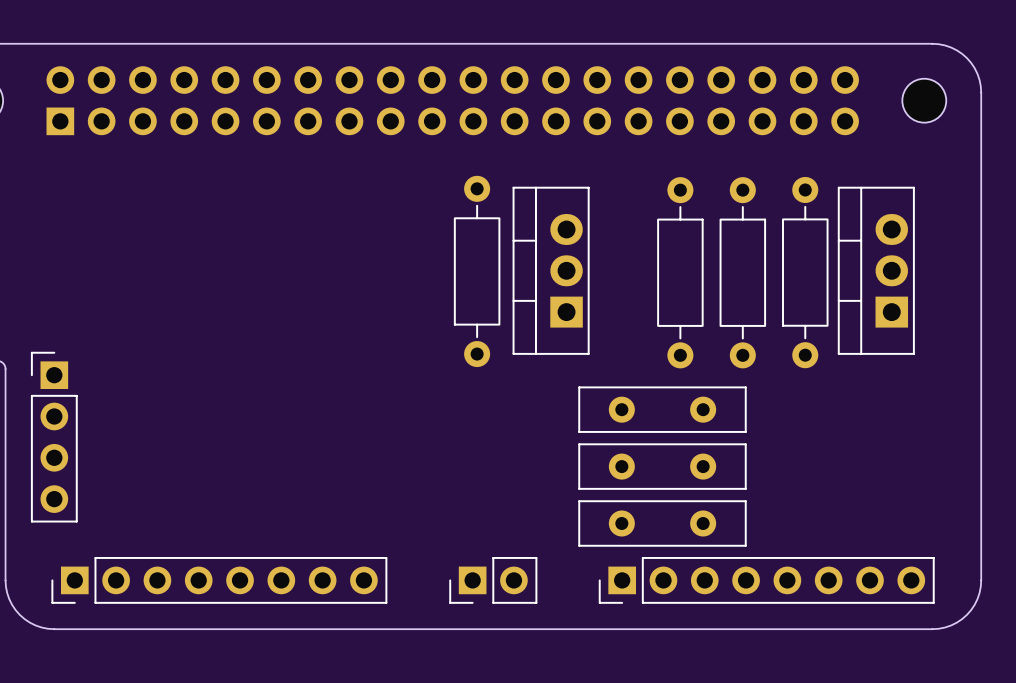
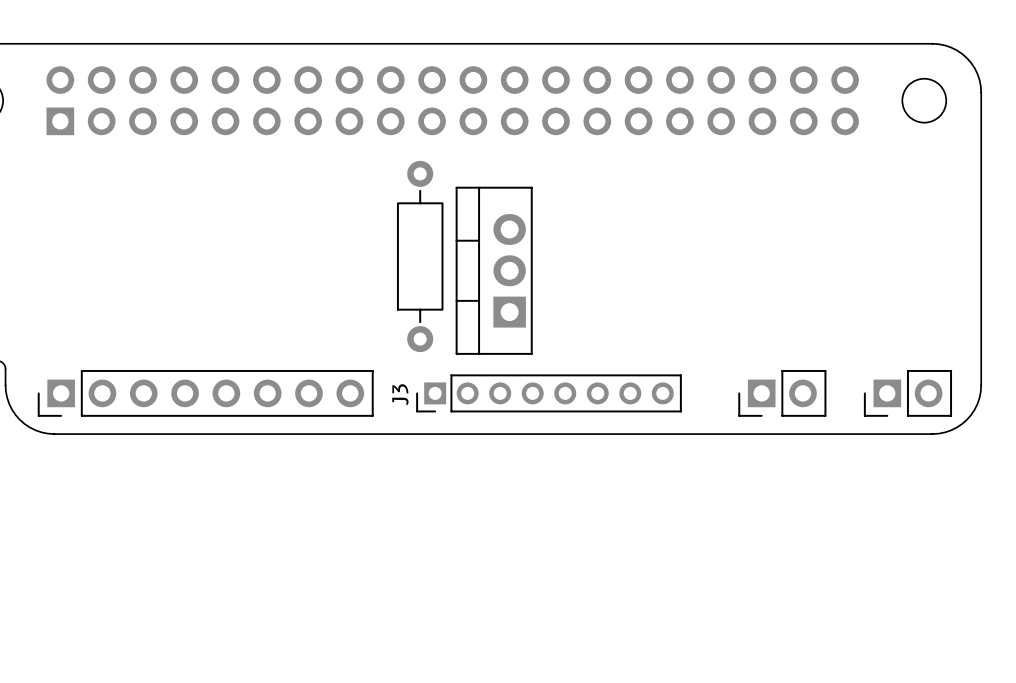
part position: (551, 270) -> (494, 270)
part: (876, 270) -> none
part position: (477, 271) -> (420, 256)
part: (680, 272) -> none
part: (742, 272) -> none
part: (805, 272) -> none
board edge: (5, 385) (5, 580) (7, 593) (15, 610) (24, 619) (35, 625) (54, 629) (932, 629) (945, 627) (962, 619) (971, 610) (977, 599) (980, 586) (981, 385) -> (5, 385) (9, 403) (19, 419) (35, 430) (54, 434) (932, 434) (951, 430) (966, 419) (977, 403) (981, 385)
J3: none -> (548, 393)
part: none -> (782, 393)
part: none -> (907, 393)
part: (662, 409) -> none
part: (54, 437) -> none
part: (662, 466) -> none
part: (662, 523) -> none
part position: (219, 580) -> (205, 393)
part: (493, 580) -> none
part: (766, 580) -> none

